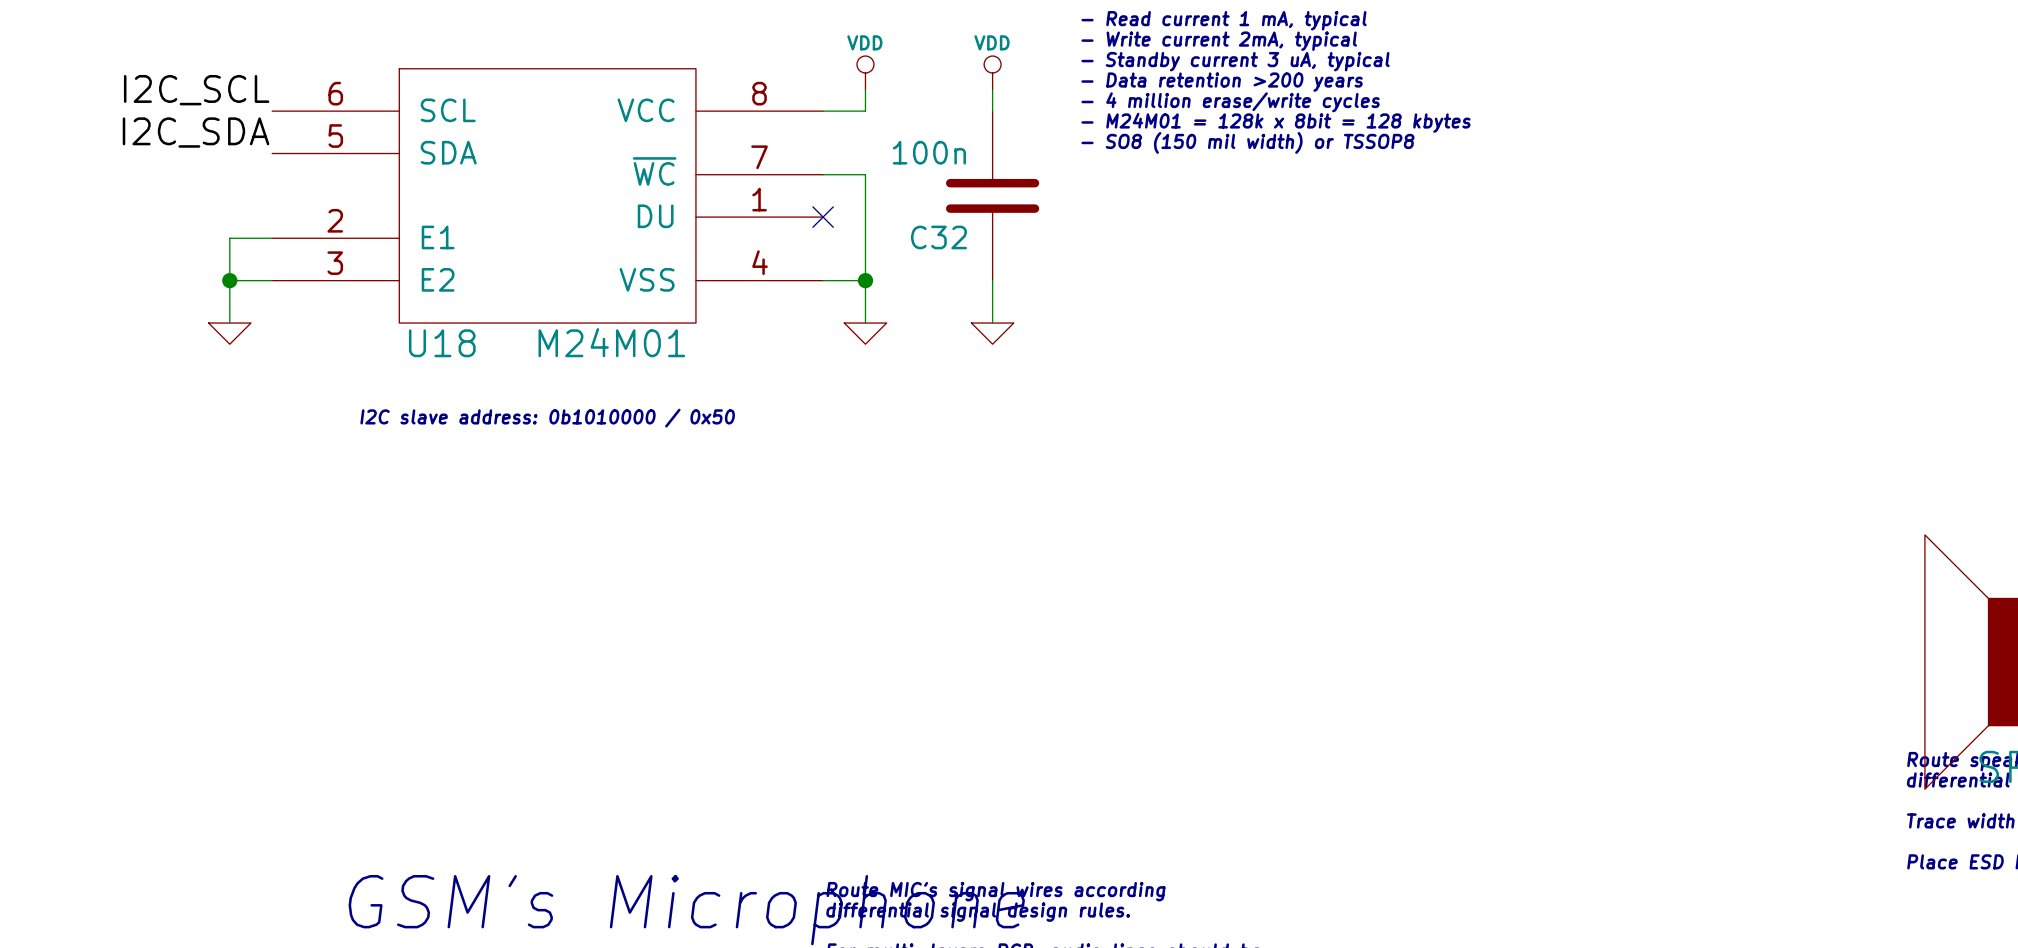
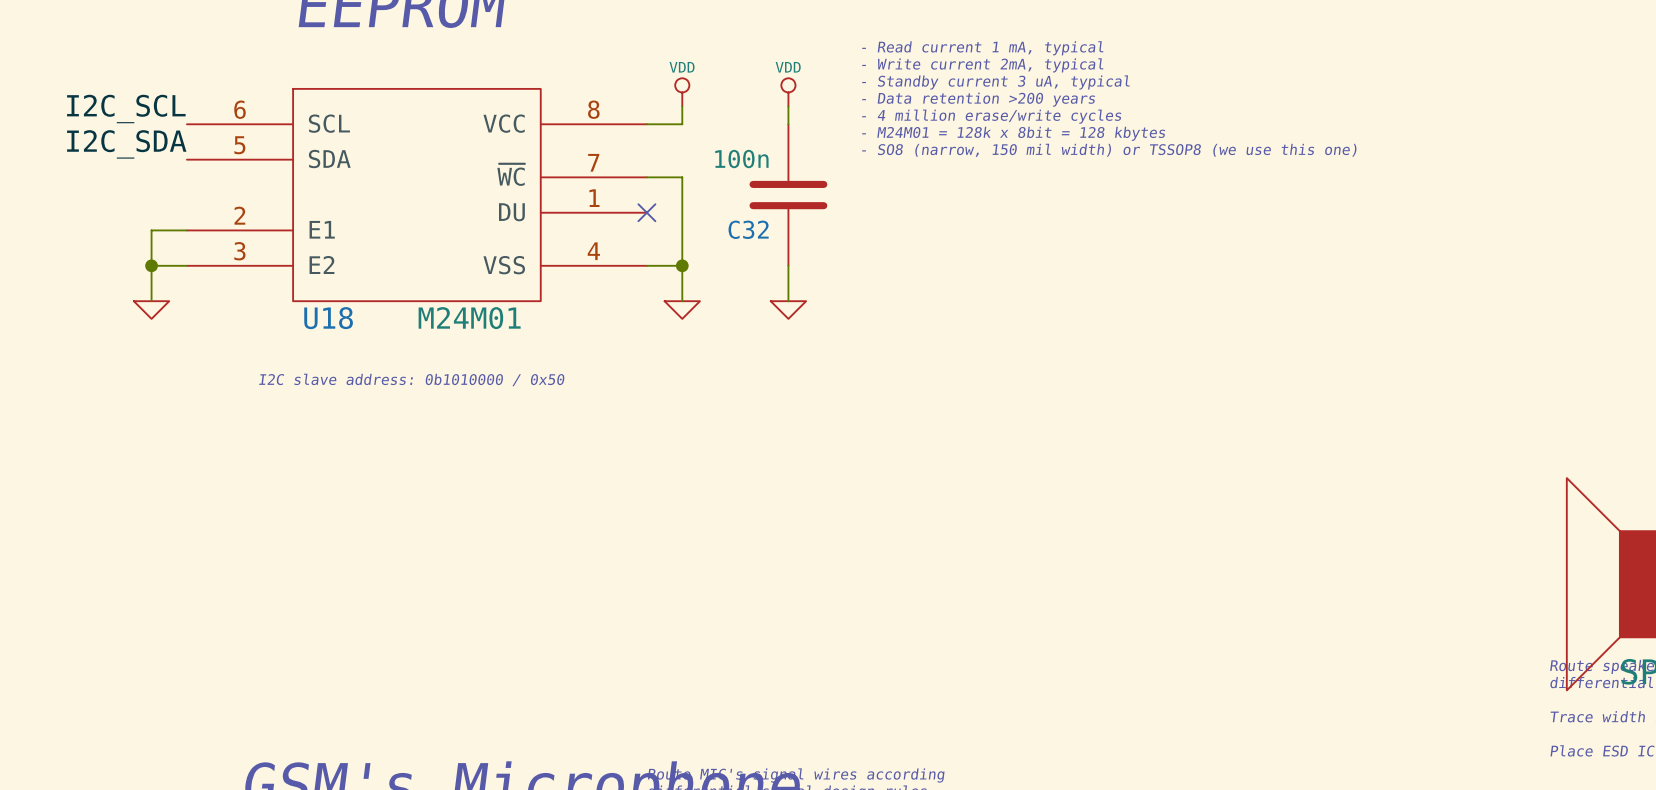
text: - SO8 (150 mil width) or TSSOP8 (1247, 142) -> - SO8 (narrow, 150 mil width) or TSSOP8 (we use this one) (1109, 150)

